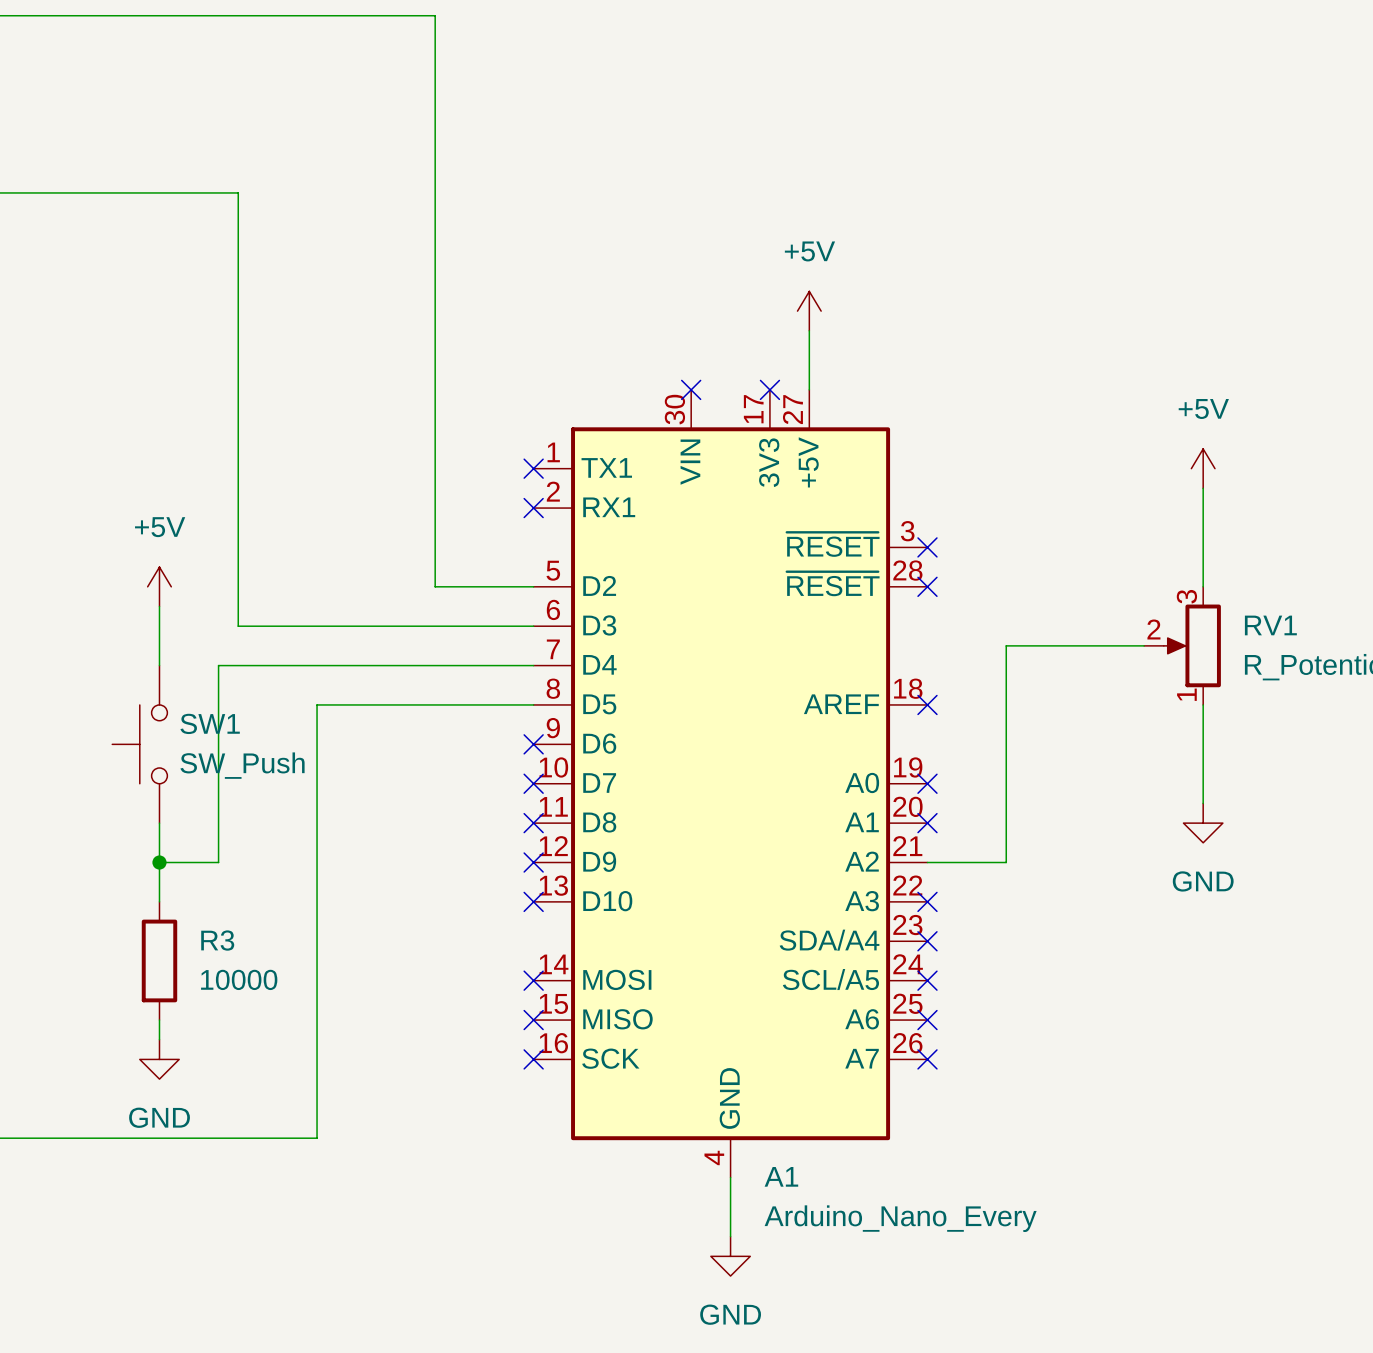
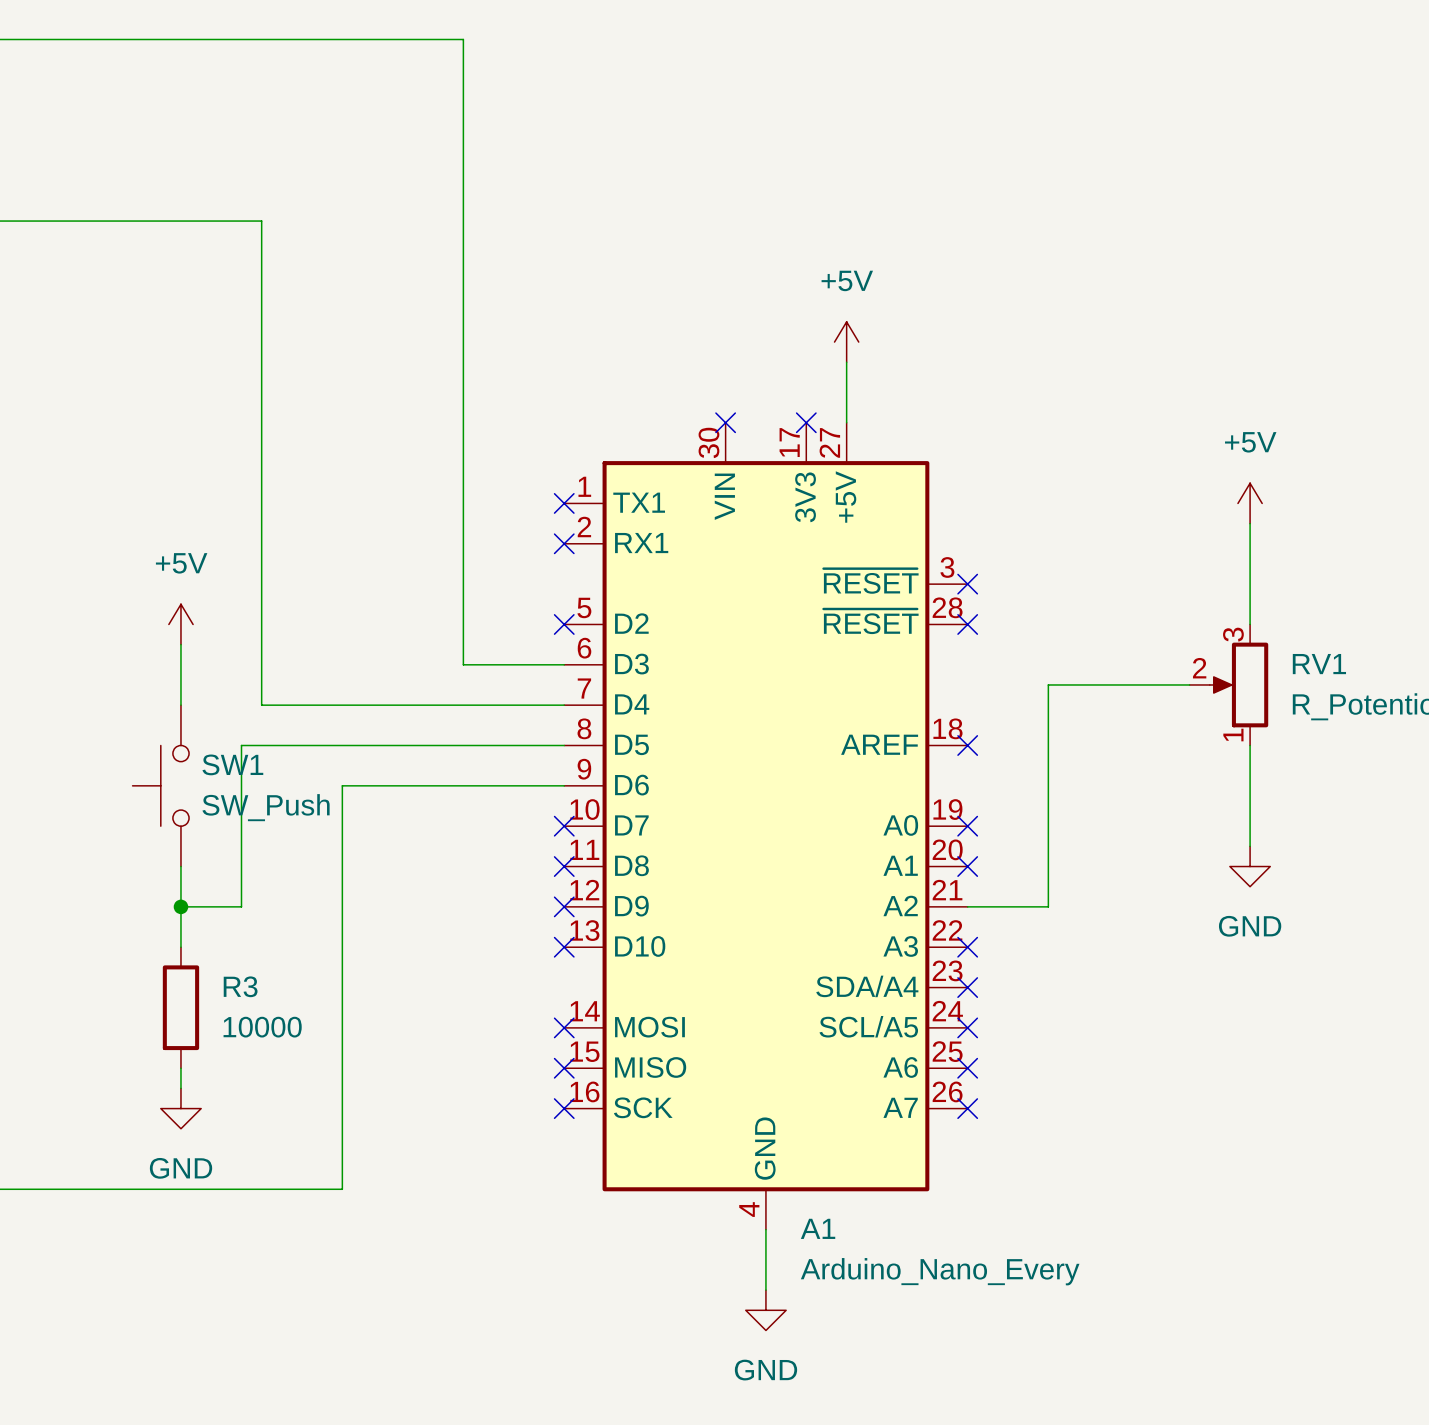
wire: (435, 586) (533, 586) -> (463, 624) (463, 664)
no-connect mark: none -> (564, 624)
wire: (238, 626) (435, 626) -> none
wire: (238, 665) (218, 665) (218, 704) -> (261, 705) (261, 664)
wire: (317, 704) (317, 744) -> (342, 745) (241, 745)
wire: none -> (342, 785) (564, 785)
no-connect mark: (533, 744) -> none

